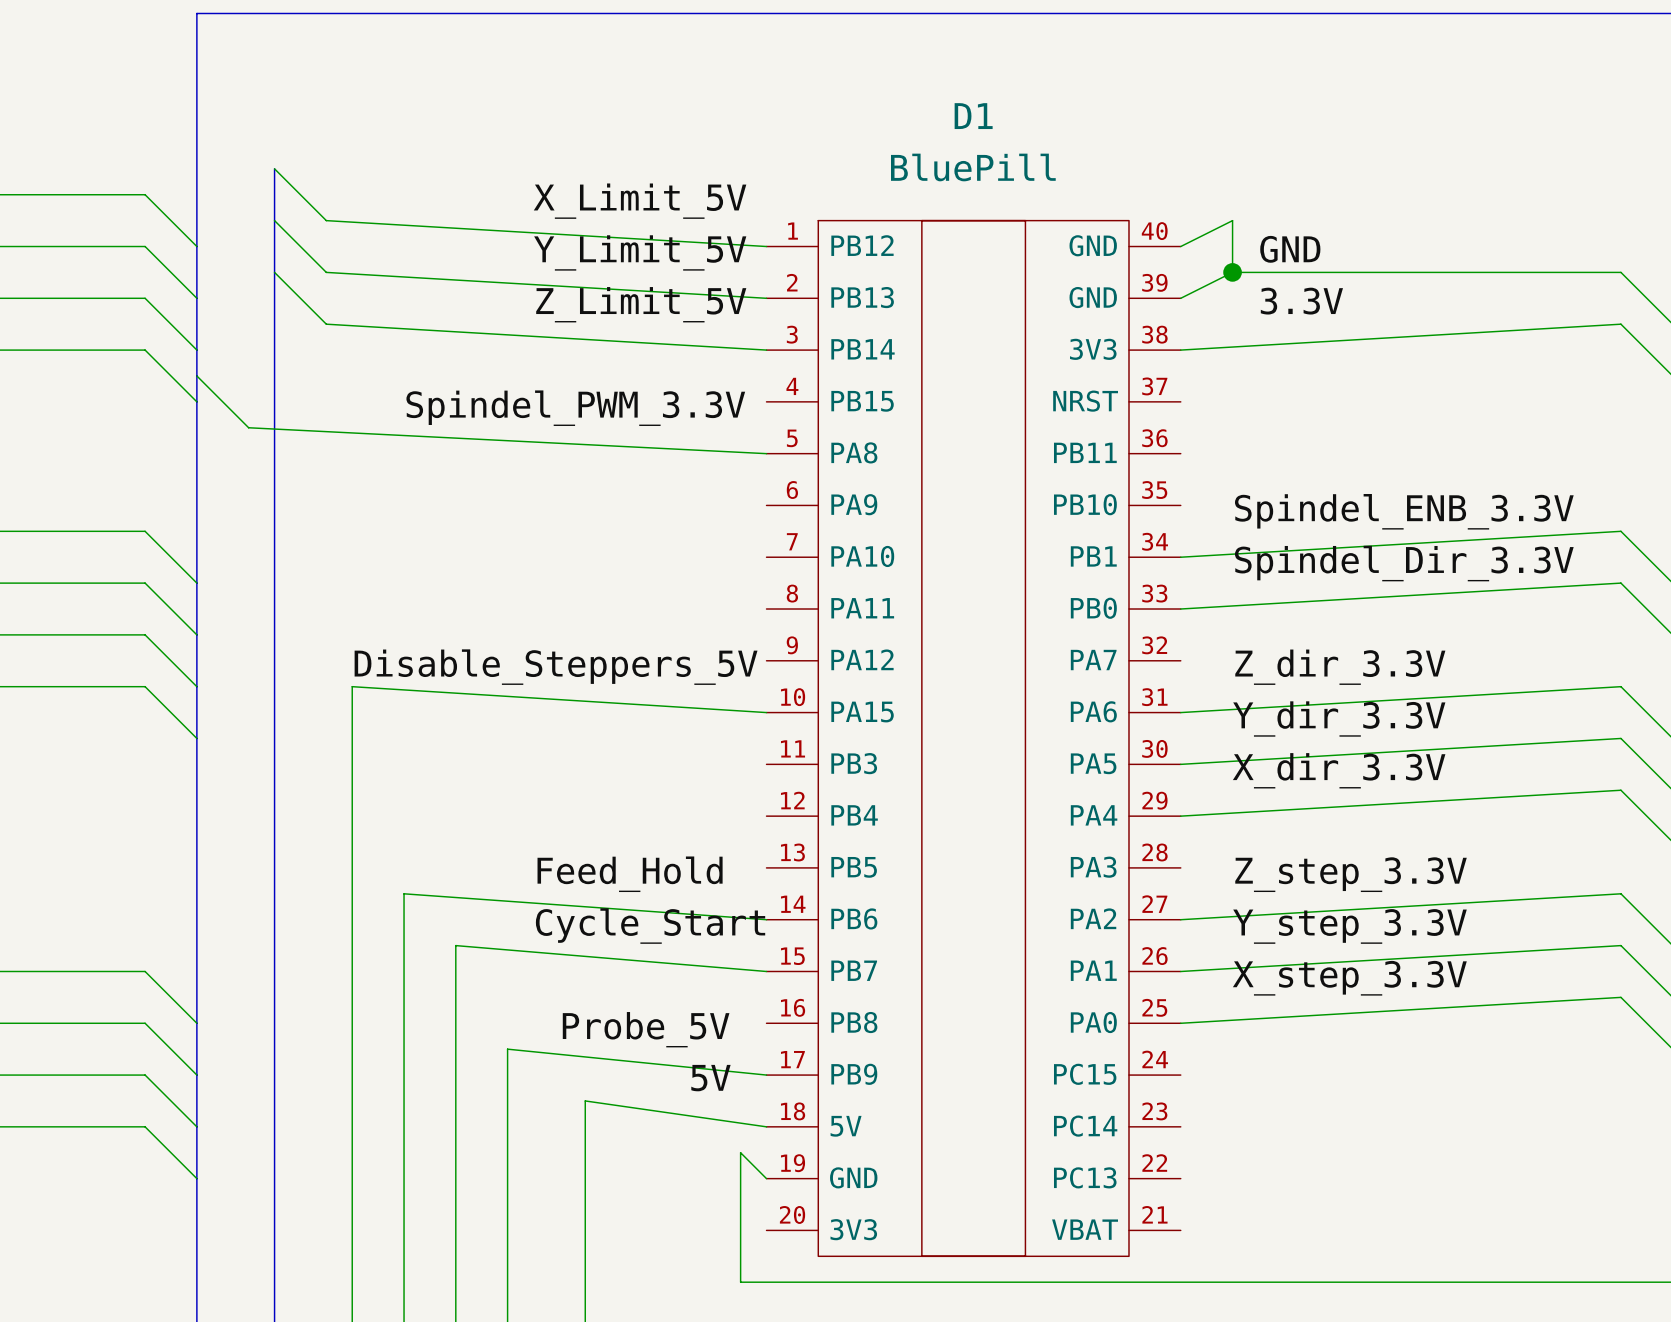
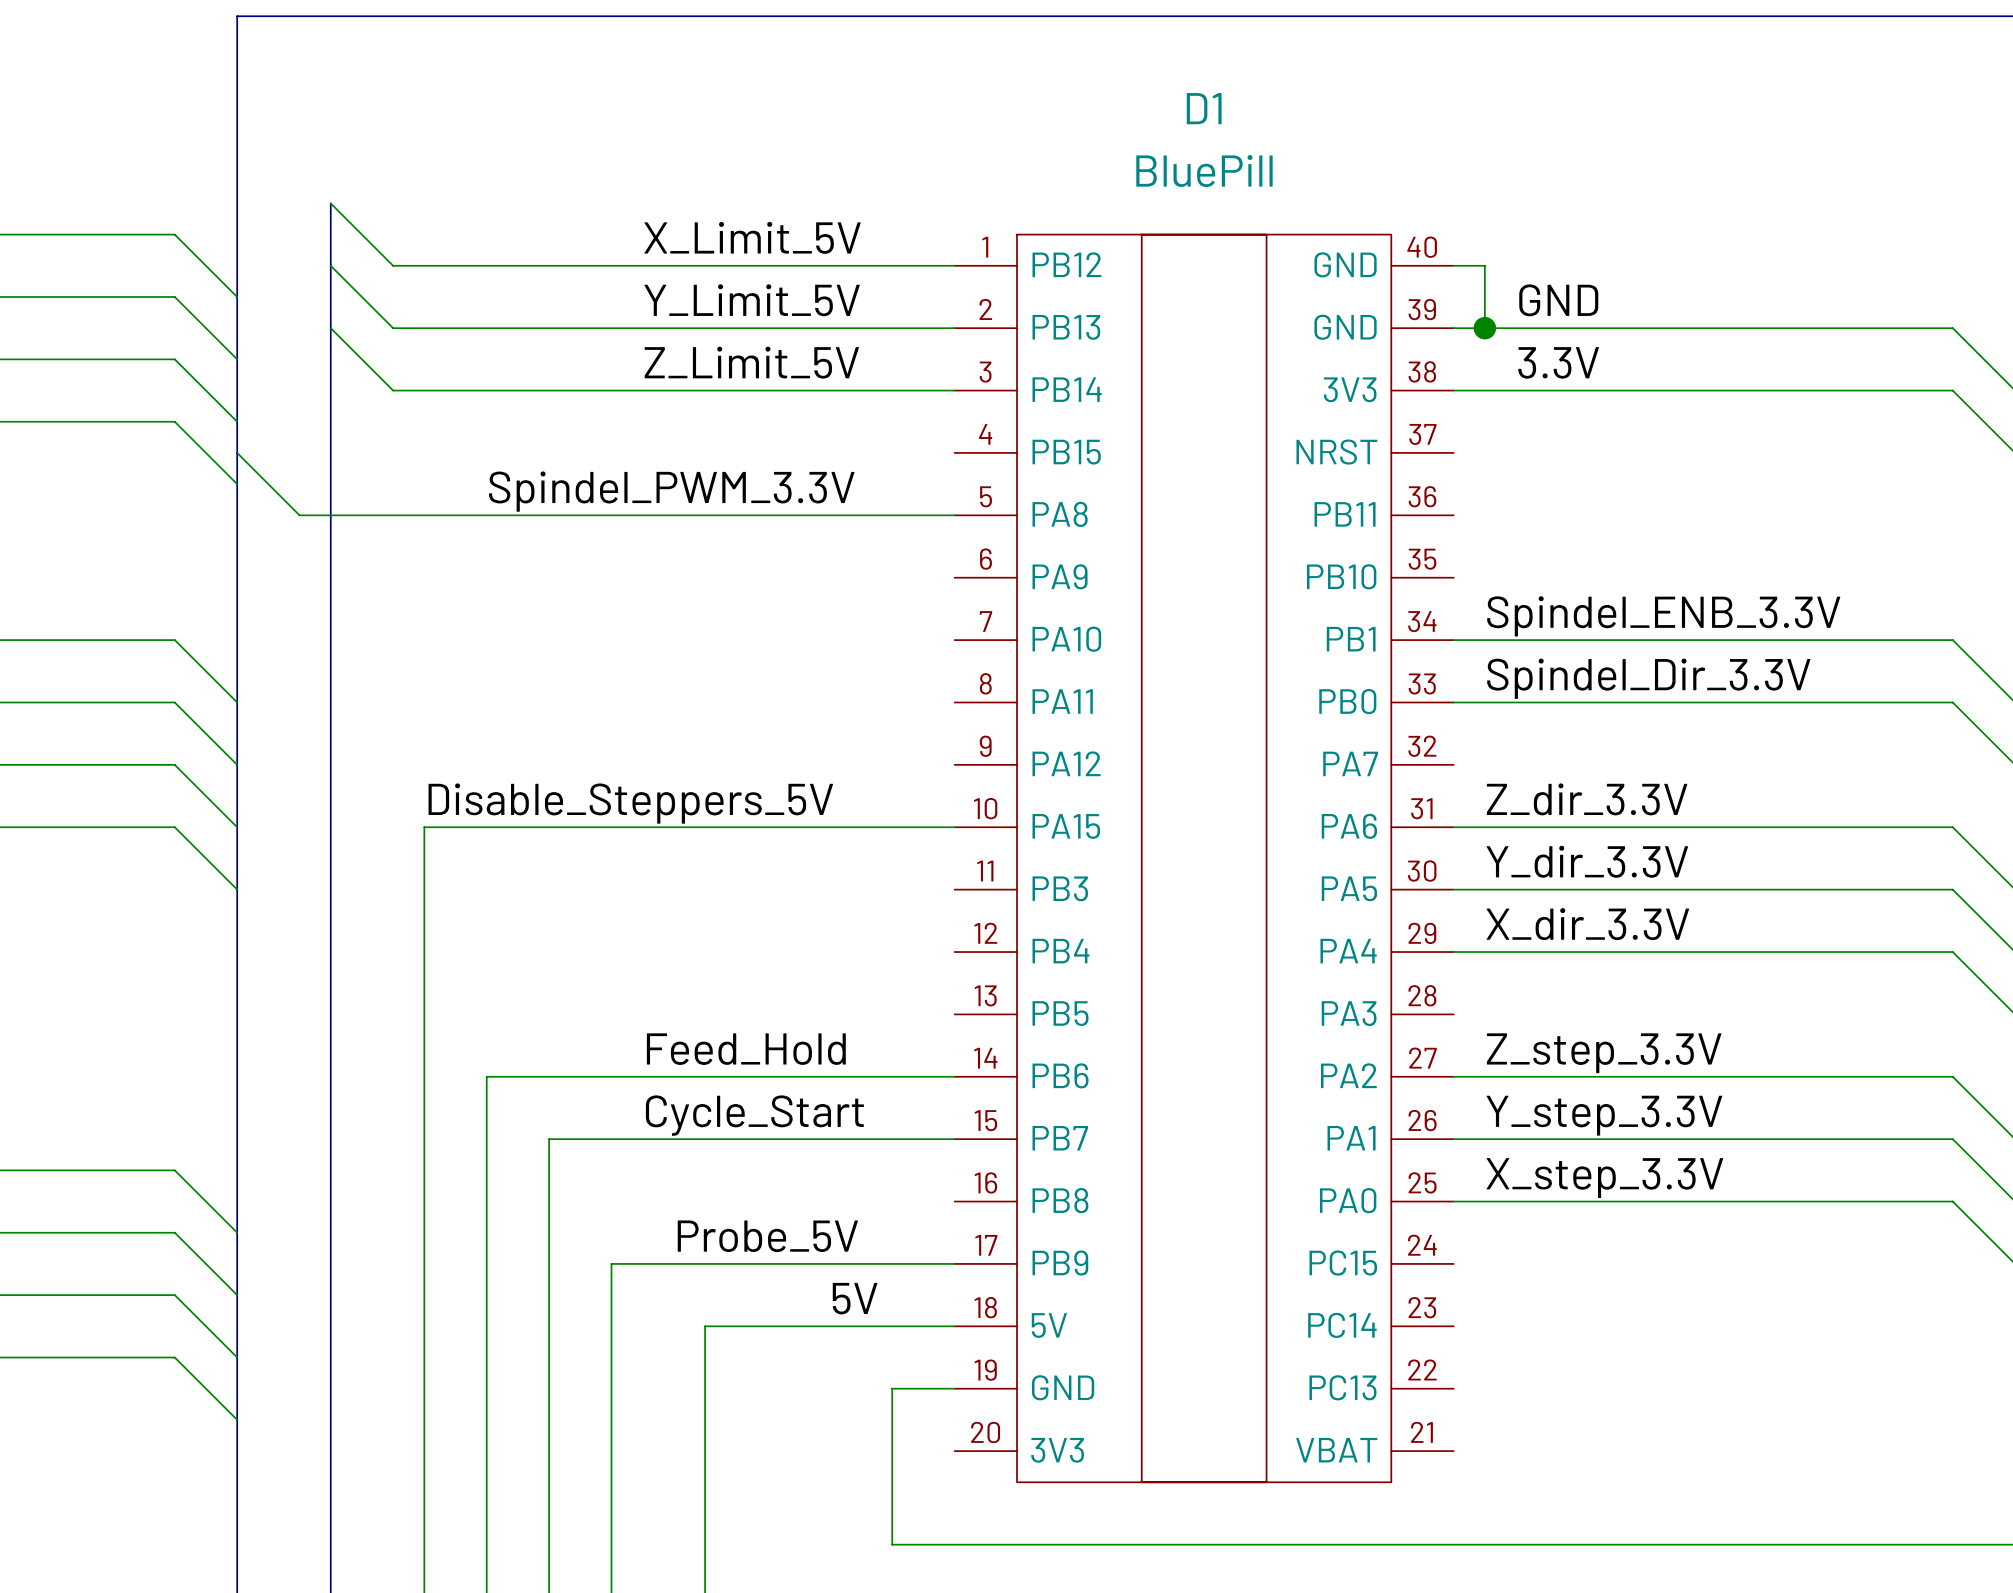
wire: (326, 220) (766, 246) -> (393, 265) (954, 265)
wire: (1232, 220) (1180, 246) -> (1484, 265) (1453, 265)
wire: (326, 272) (766, 298) -> (393, 328) (954, 328)
wire: (1232, 272) (1180, 298) -> (1484, 328) (1453, 328)
wire: (326, 324) (766, 350) -> (393, 390) (954, 390)
wire: (1620, 324) (1180, 350) -> (1952, 390) (1453, 390)
wire: (248, 427) (766, 453) -> (299, 515) (954, 515)
wire: (1620, 531) (1180, 557) -> (1952, 640) (1453, 640)
wire: (1620, 583) (1180, 609) -> (1952, 702) (1453, 702)
wire: (352, 686) (766, 712) -> (424, 827) (954, 827)
wire: (1620, 686) (1180, 712) -> (1952, 827) (1453, 827)
D1 position: (973, 738) -> (1204, 858)
wire: (1620, 738) (1180, 764) -> (1952, 889) (1453, 889)
wire: (1620, 790) (1180, 816) -> (1952, 952) (1453, 952)
wire: (404, 893) (766, 919) -> (486, 1076) (954, 1076)
wire: (1620, 893) (1180, 919) -> (1952, 1076) (1453, 1076)
wire: (455, 945) (766, 971) -> (549, 1139) (954, 1139)
wire: (1620, 945) (1180, 971) -> (1952, 1139) (1453, 1139)
wire: (1620, 997) (1180, 1023) -> (1952, 1201) (1453, 1201)
wire: (507, 1049) (766, 1075) -> (611, 1263) (954, 1263)
wire: (585, 1100) (766, 1126) -> (705, 1326) (954, 1326)
wire: (740, 1152) (766, 1178) -> (892, 1388) (954, 1388)

